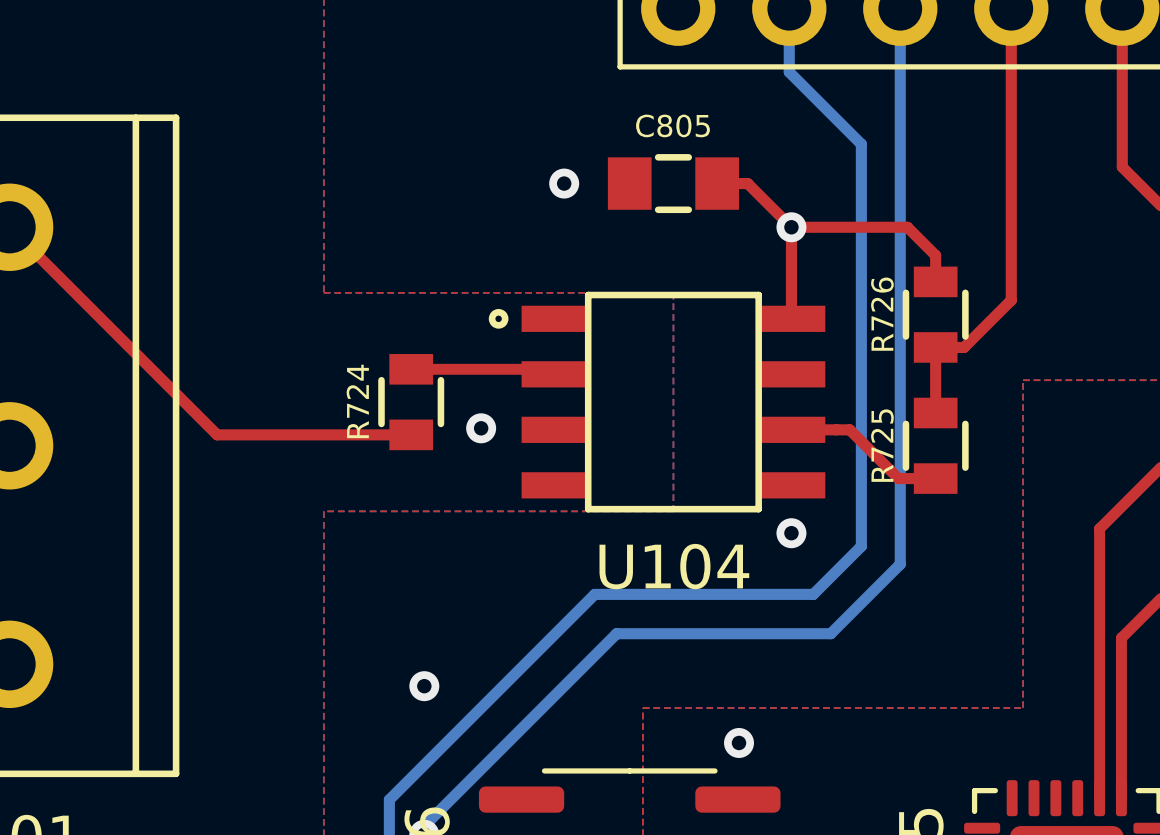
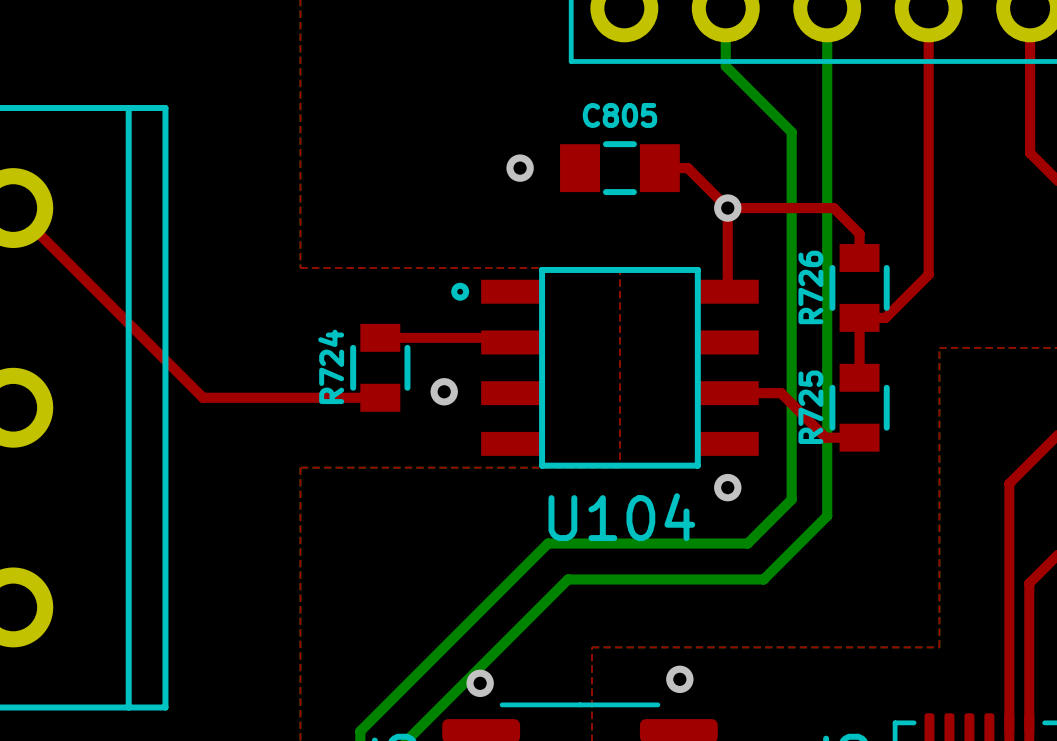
via position: (424, 686) -> (480, 683)

